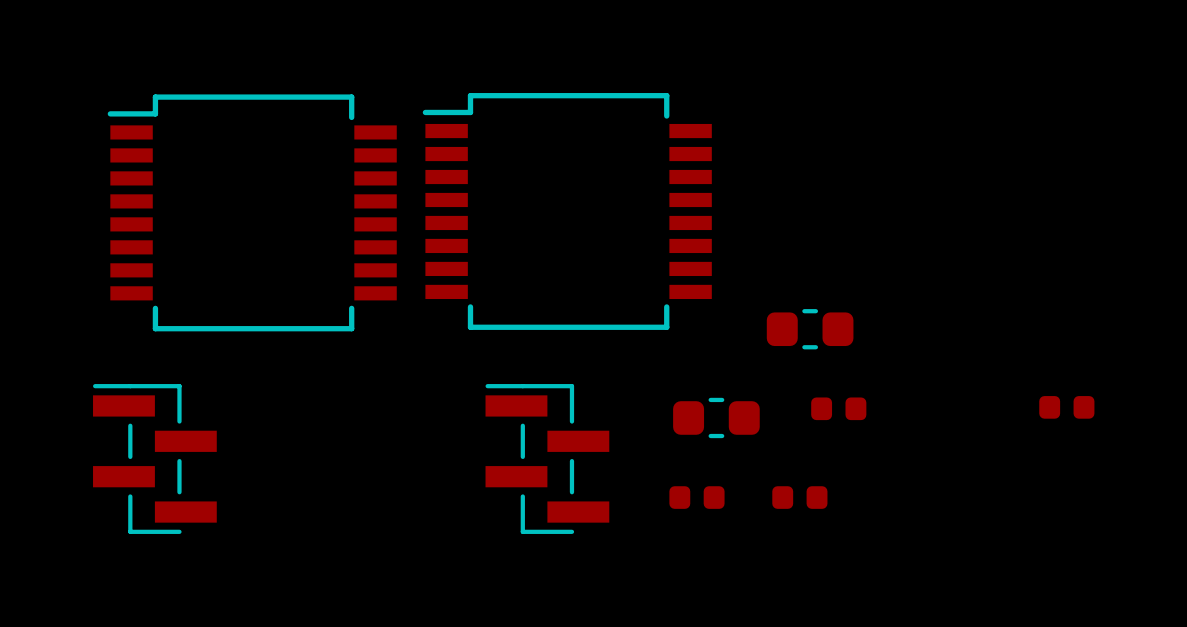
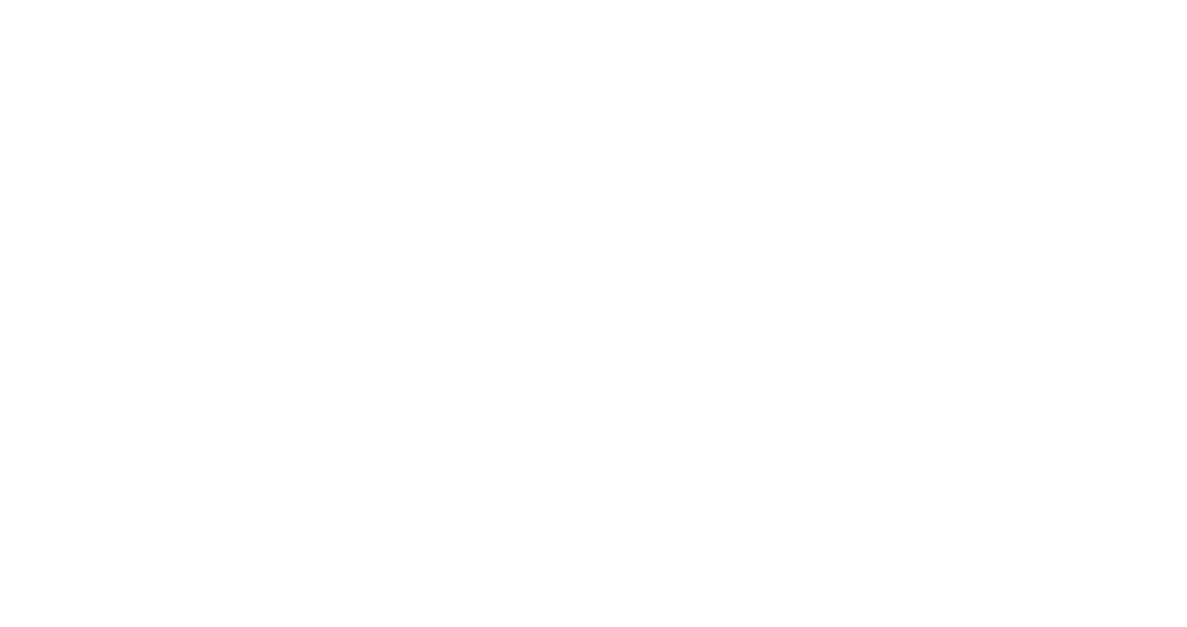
part: (567, 211) -> none
part: (252, 212) -> none
part: (810, 329) -> none
part: (1066, 407) -> none
part: (838, 408) -> none
part: (716, 417) -> none
part: (154, 459) -> none
part: (547, 459) -> none
part: (696, 497) -> none
part: (799, 497) -> none

